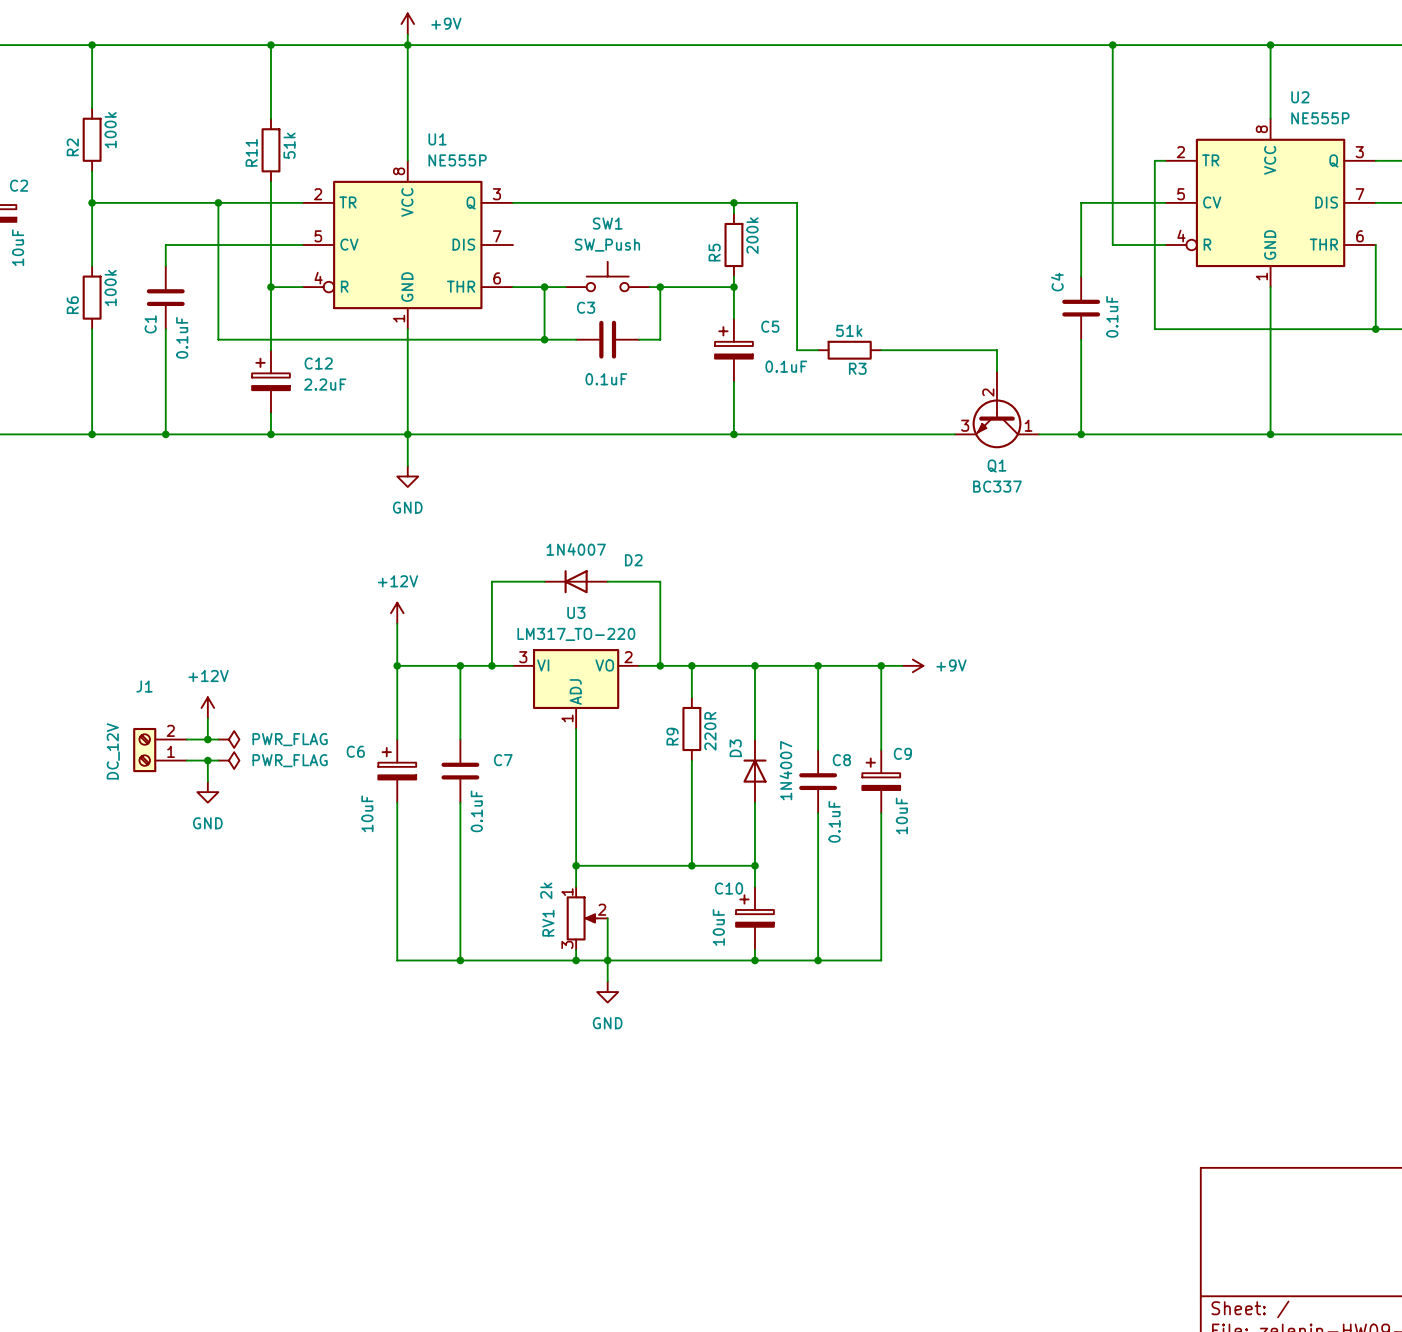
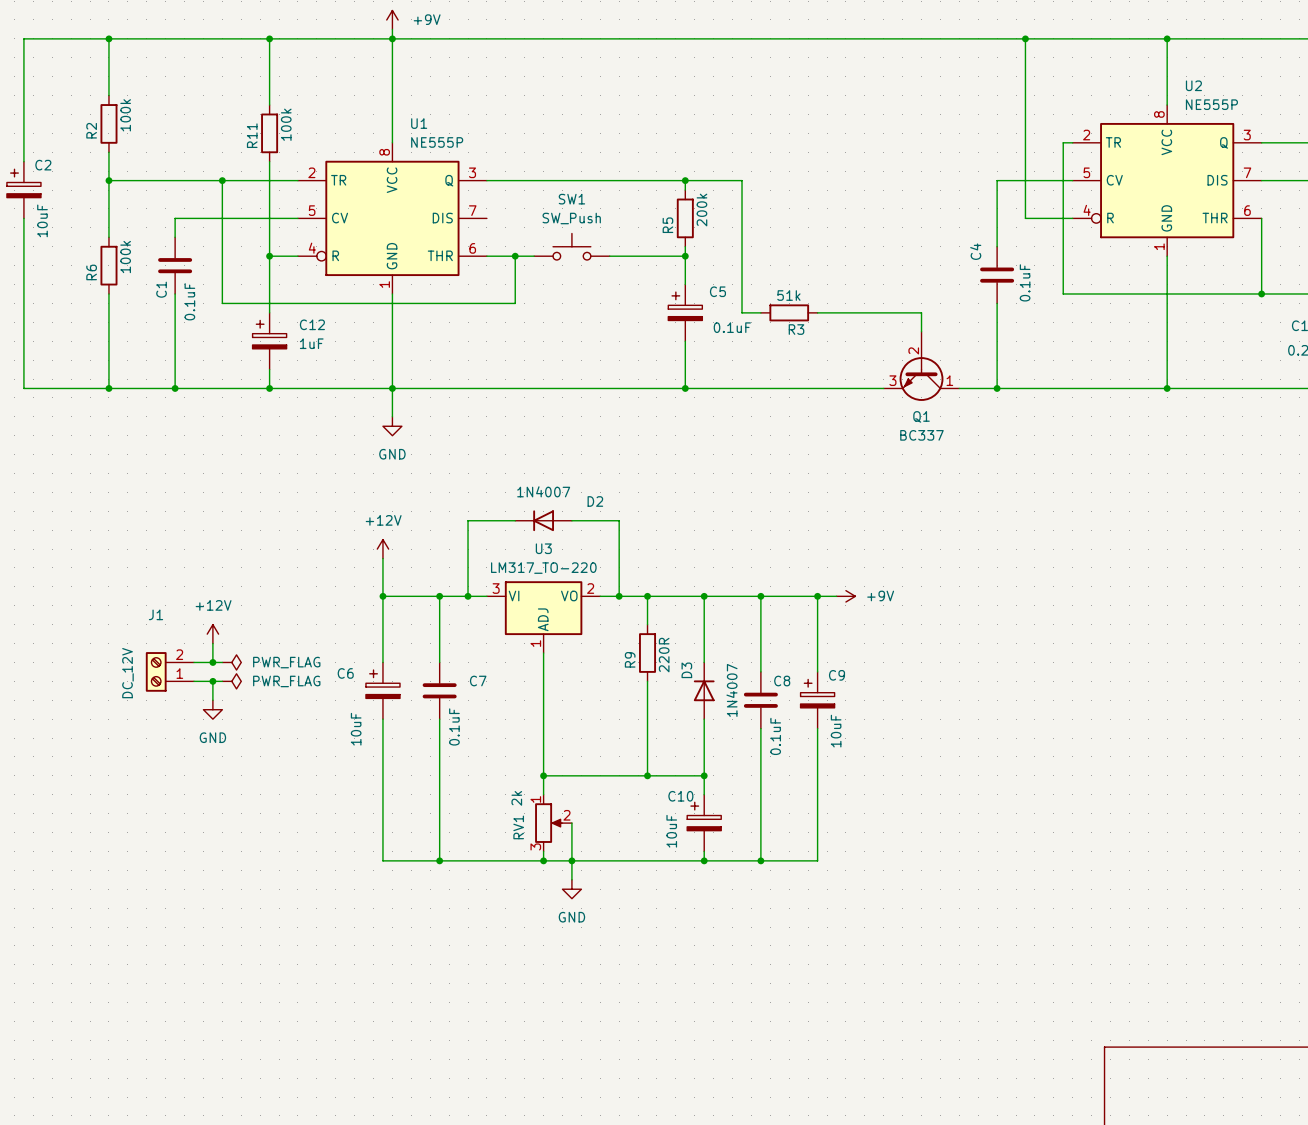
R11 value: 51k (289, 145) -> 100k (286, 124)
wire: (660, 287) (660, 339) (639, 339) -> none
junction: (660, 287) -> none
wire: (544, 339) (576, 339) -> none
junction: (544, 339) -> none
C3: 0.1uF (607, 339) -> none
C12 value: 2.2uF (325, 384) -> 1uF (311, 343)

